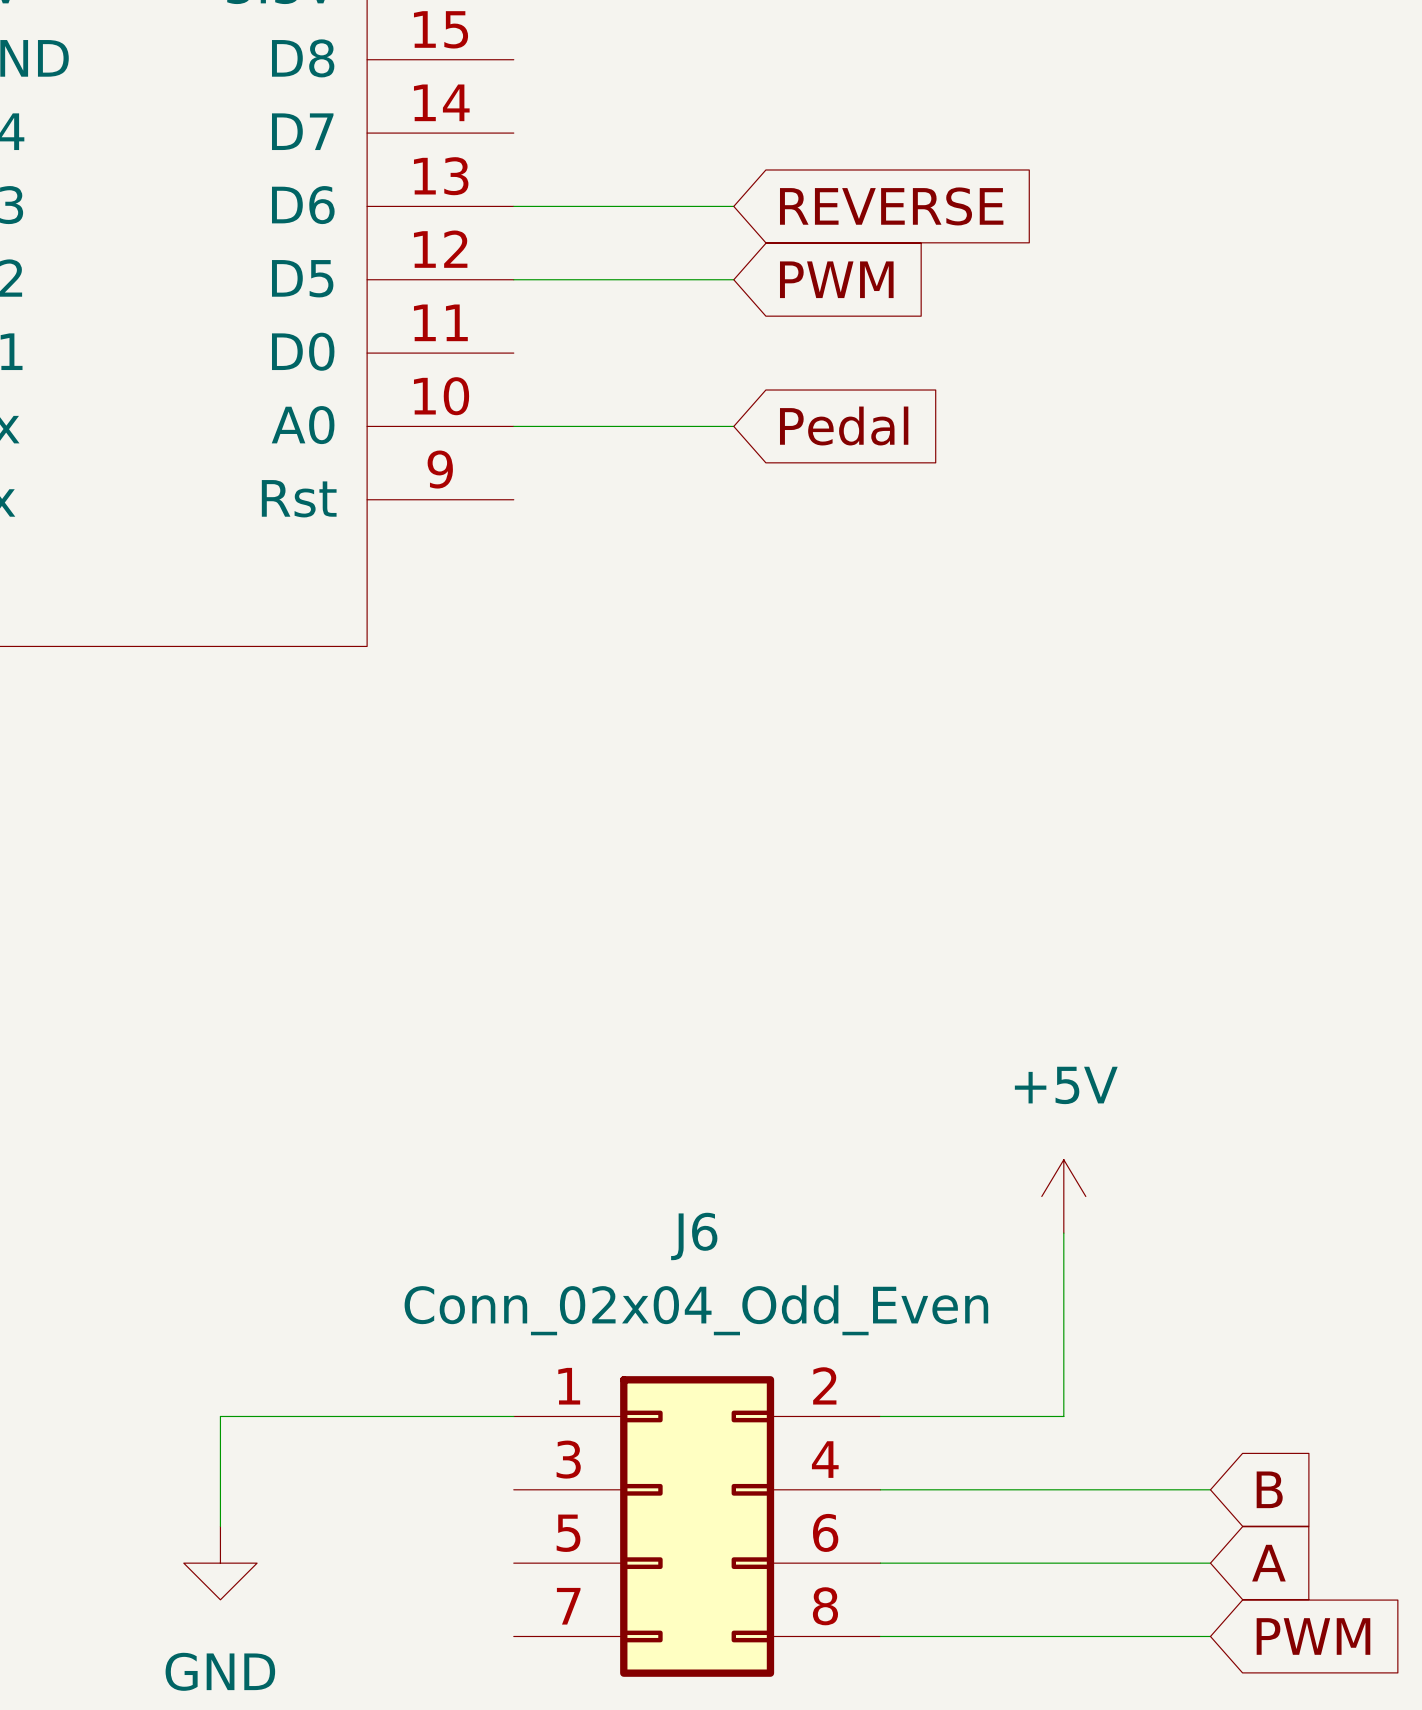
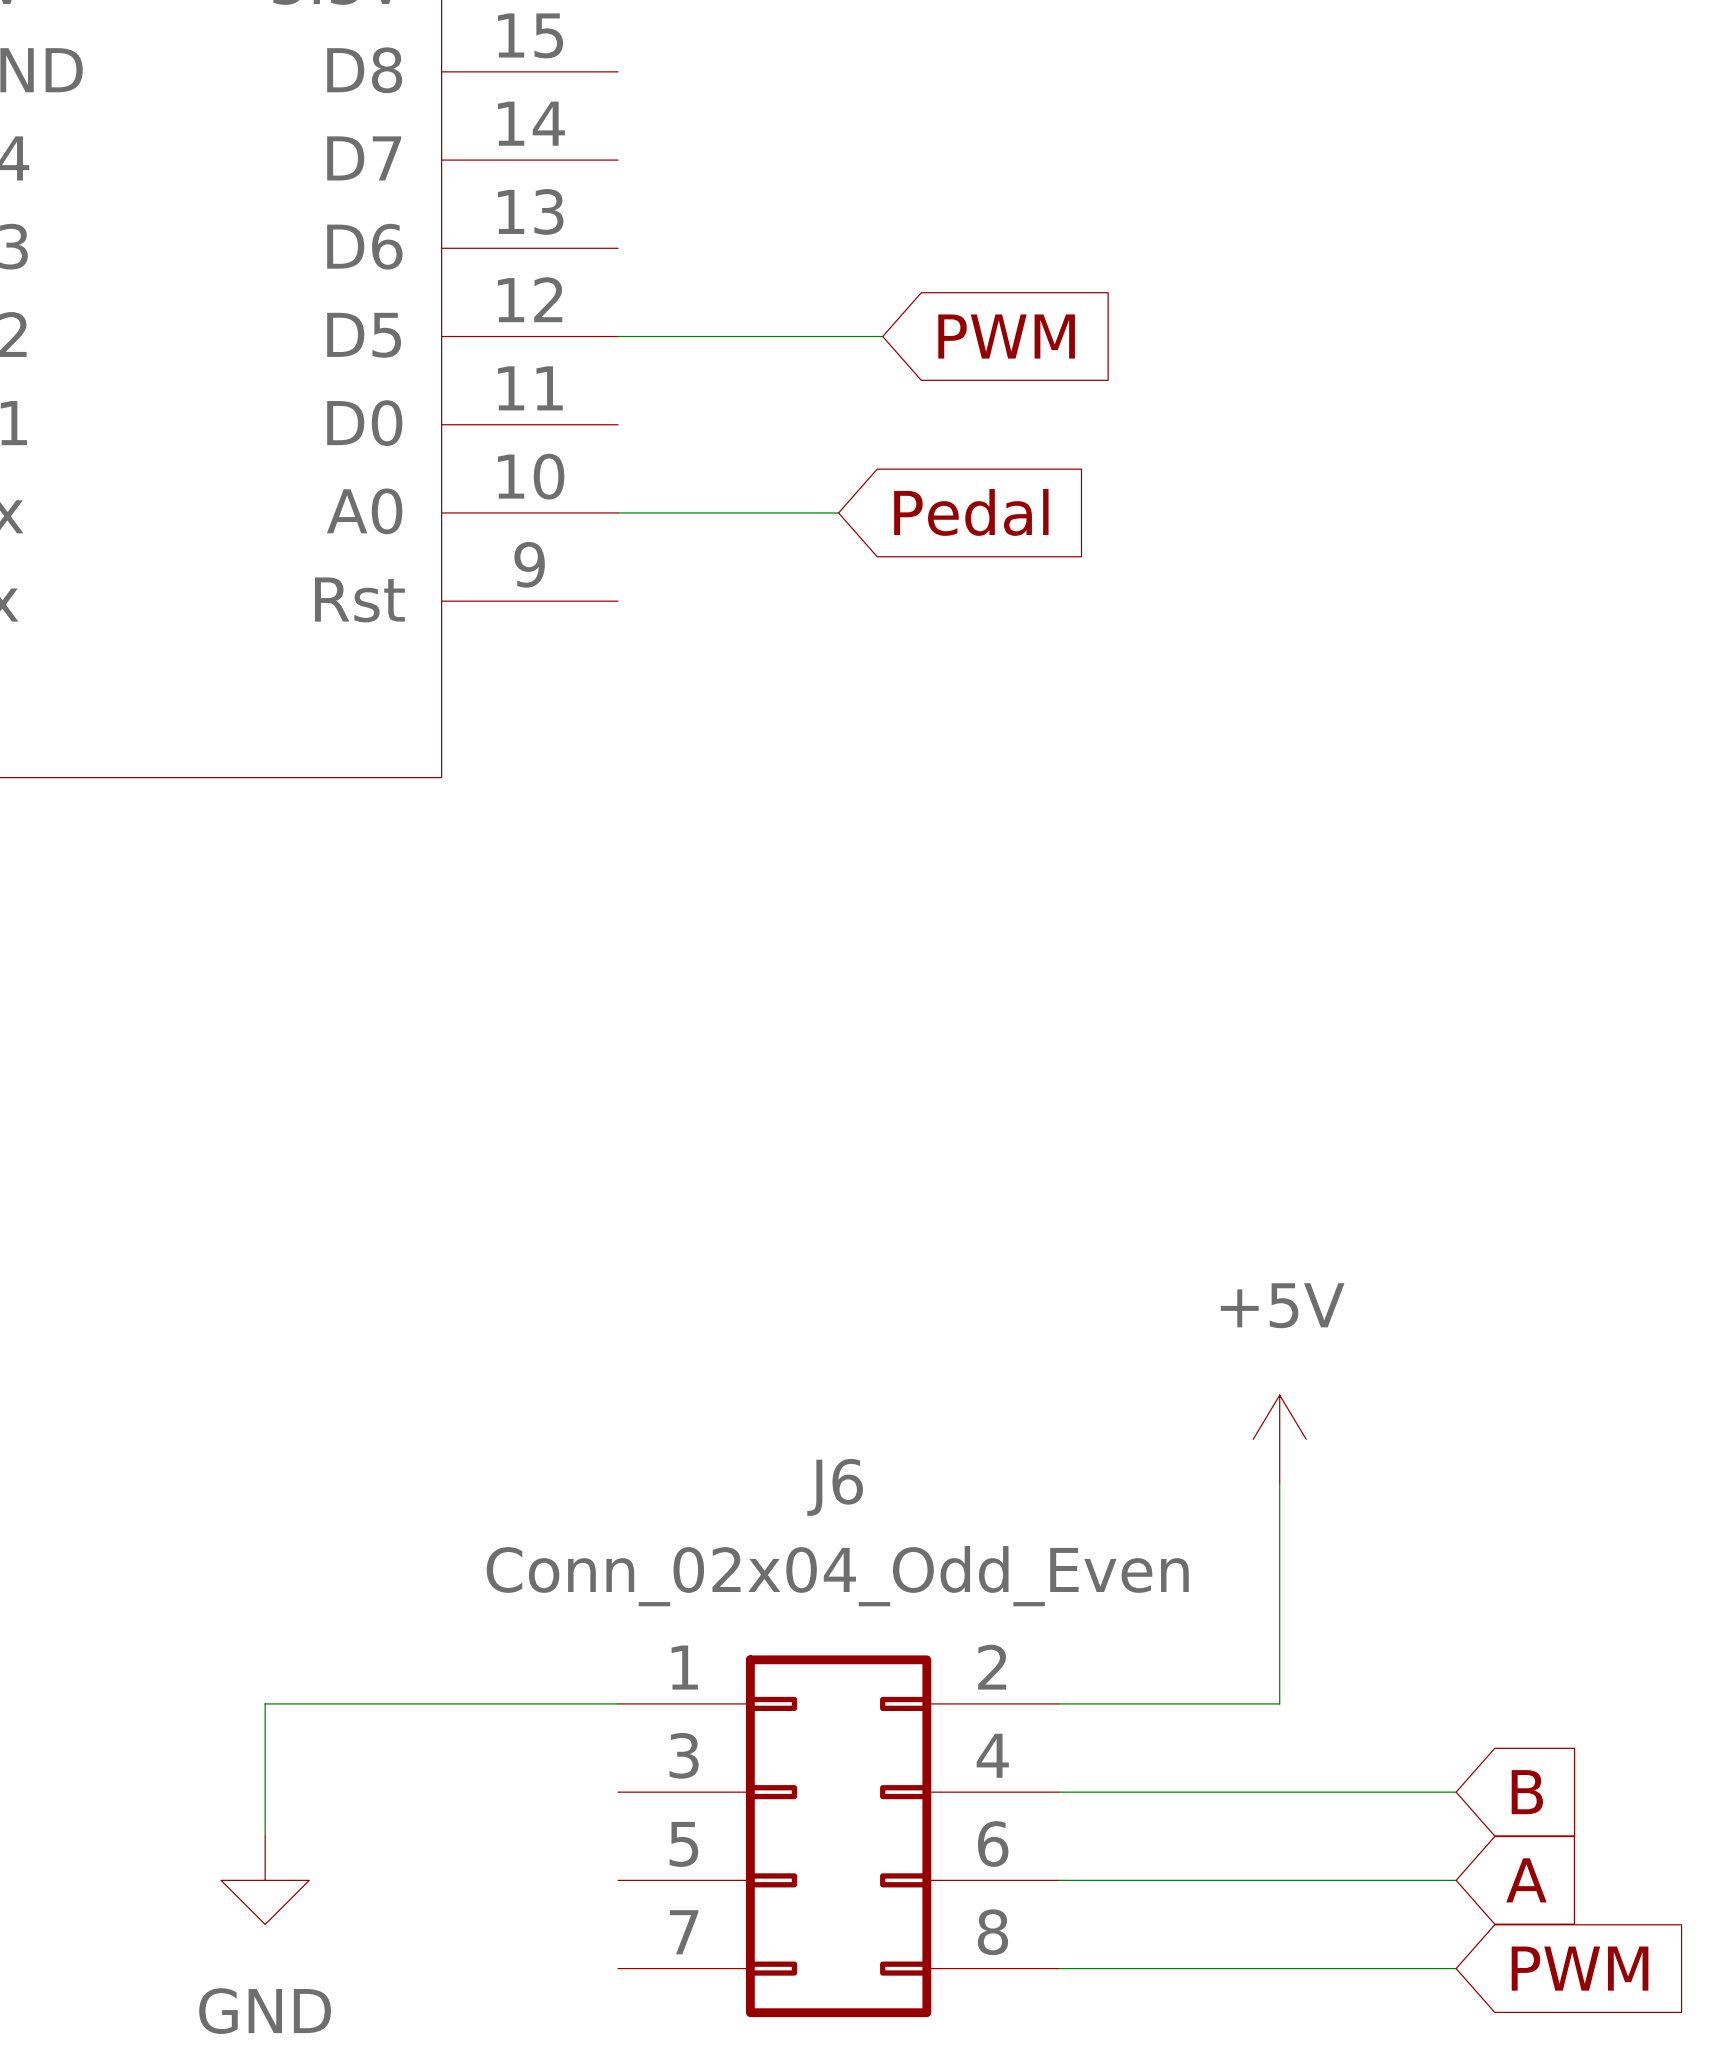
wire: (513, 206) (733, 206) -> none
global label: REVERSE (891, 206) -> none
wire: (697, 426) (733, 426) -> none
global label position: Pedal (844, 426) -> Pedal (971, 512)

